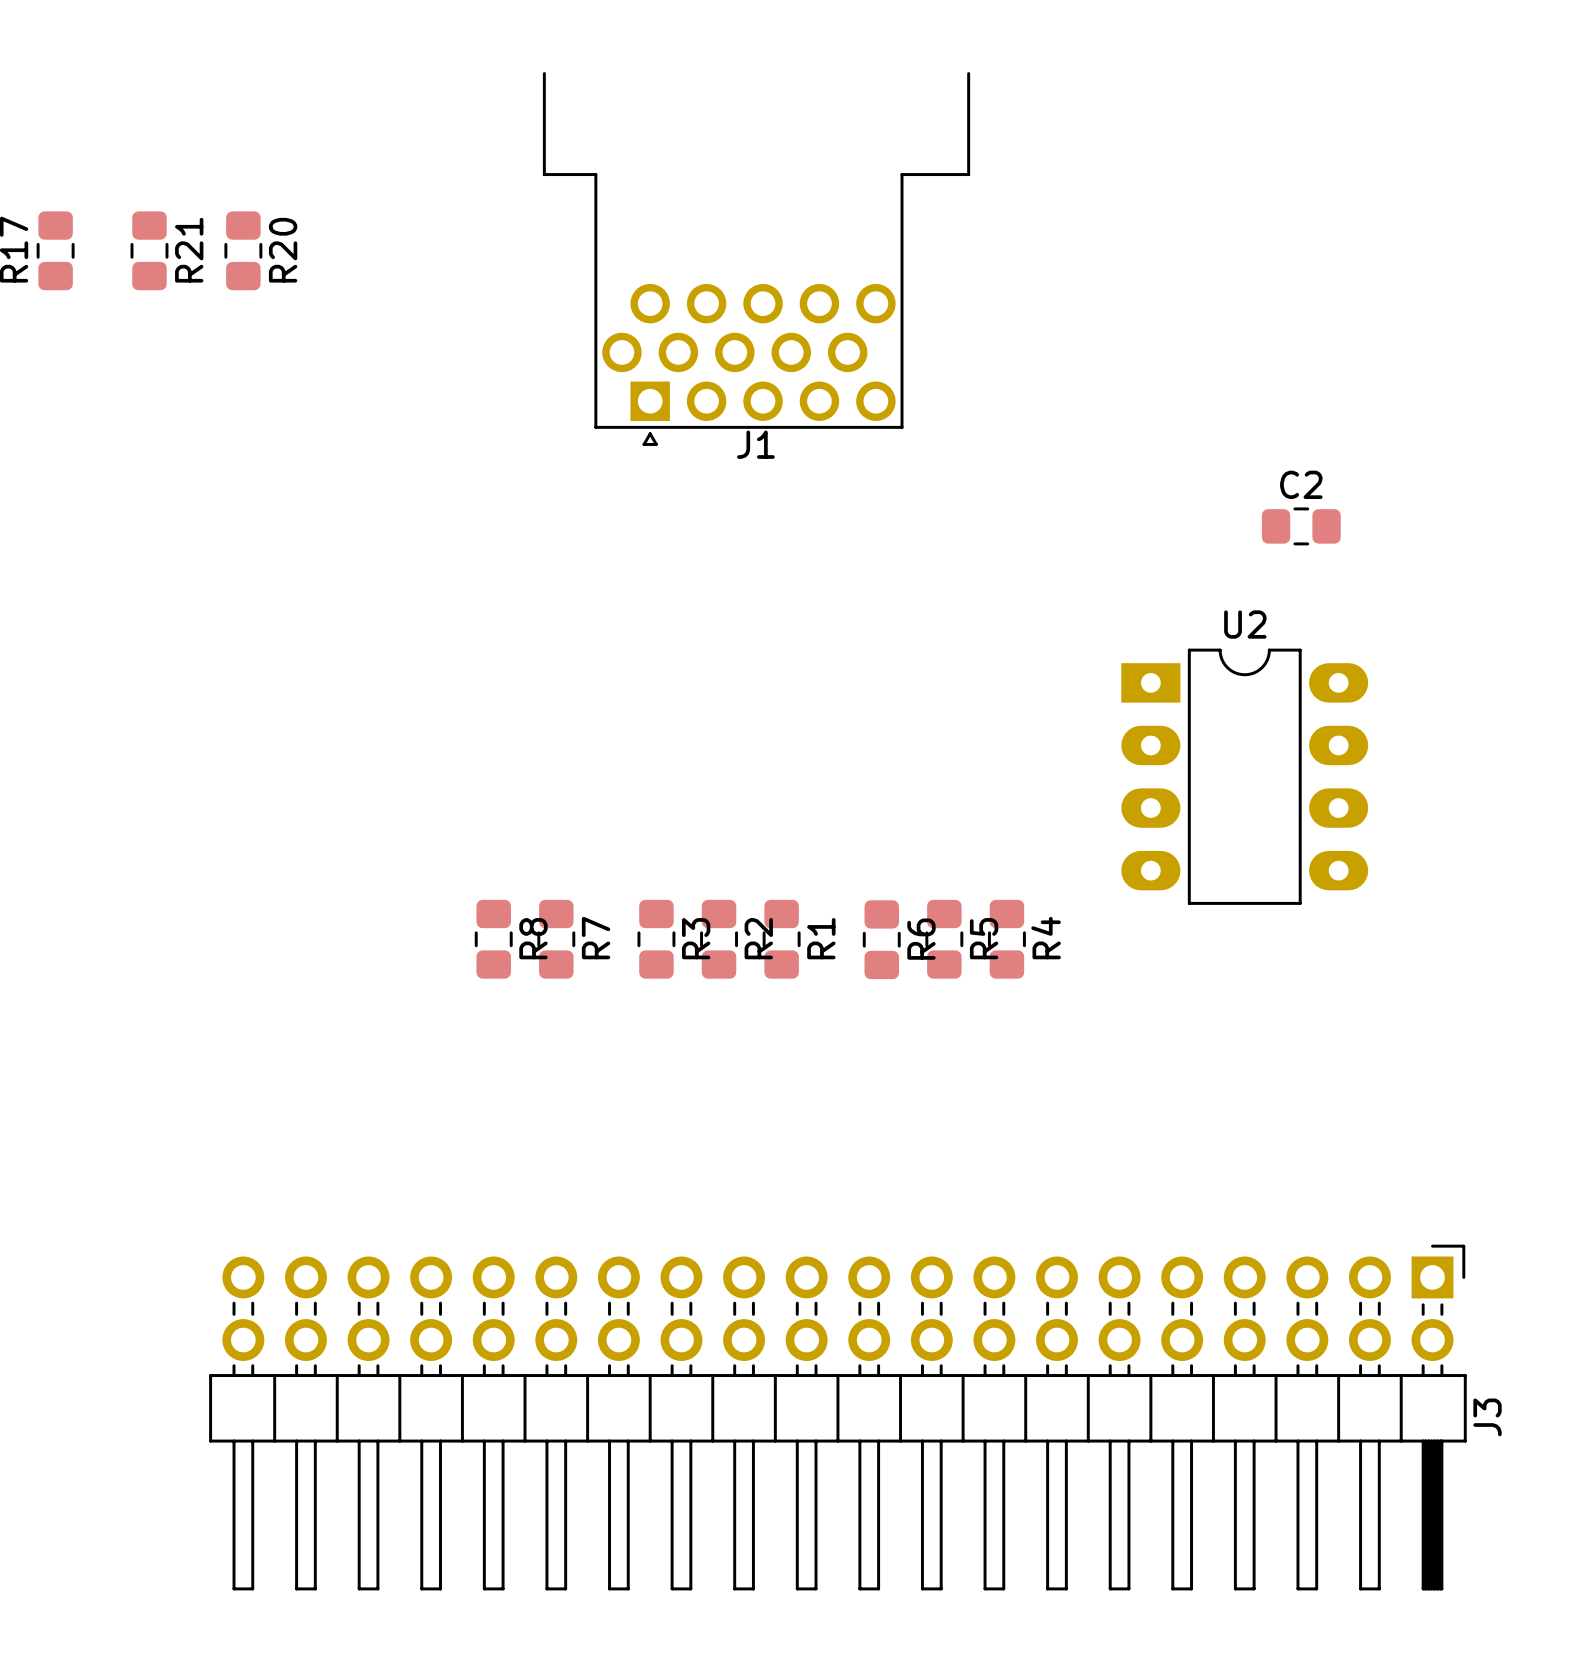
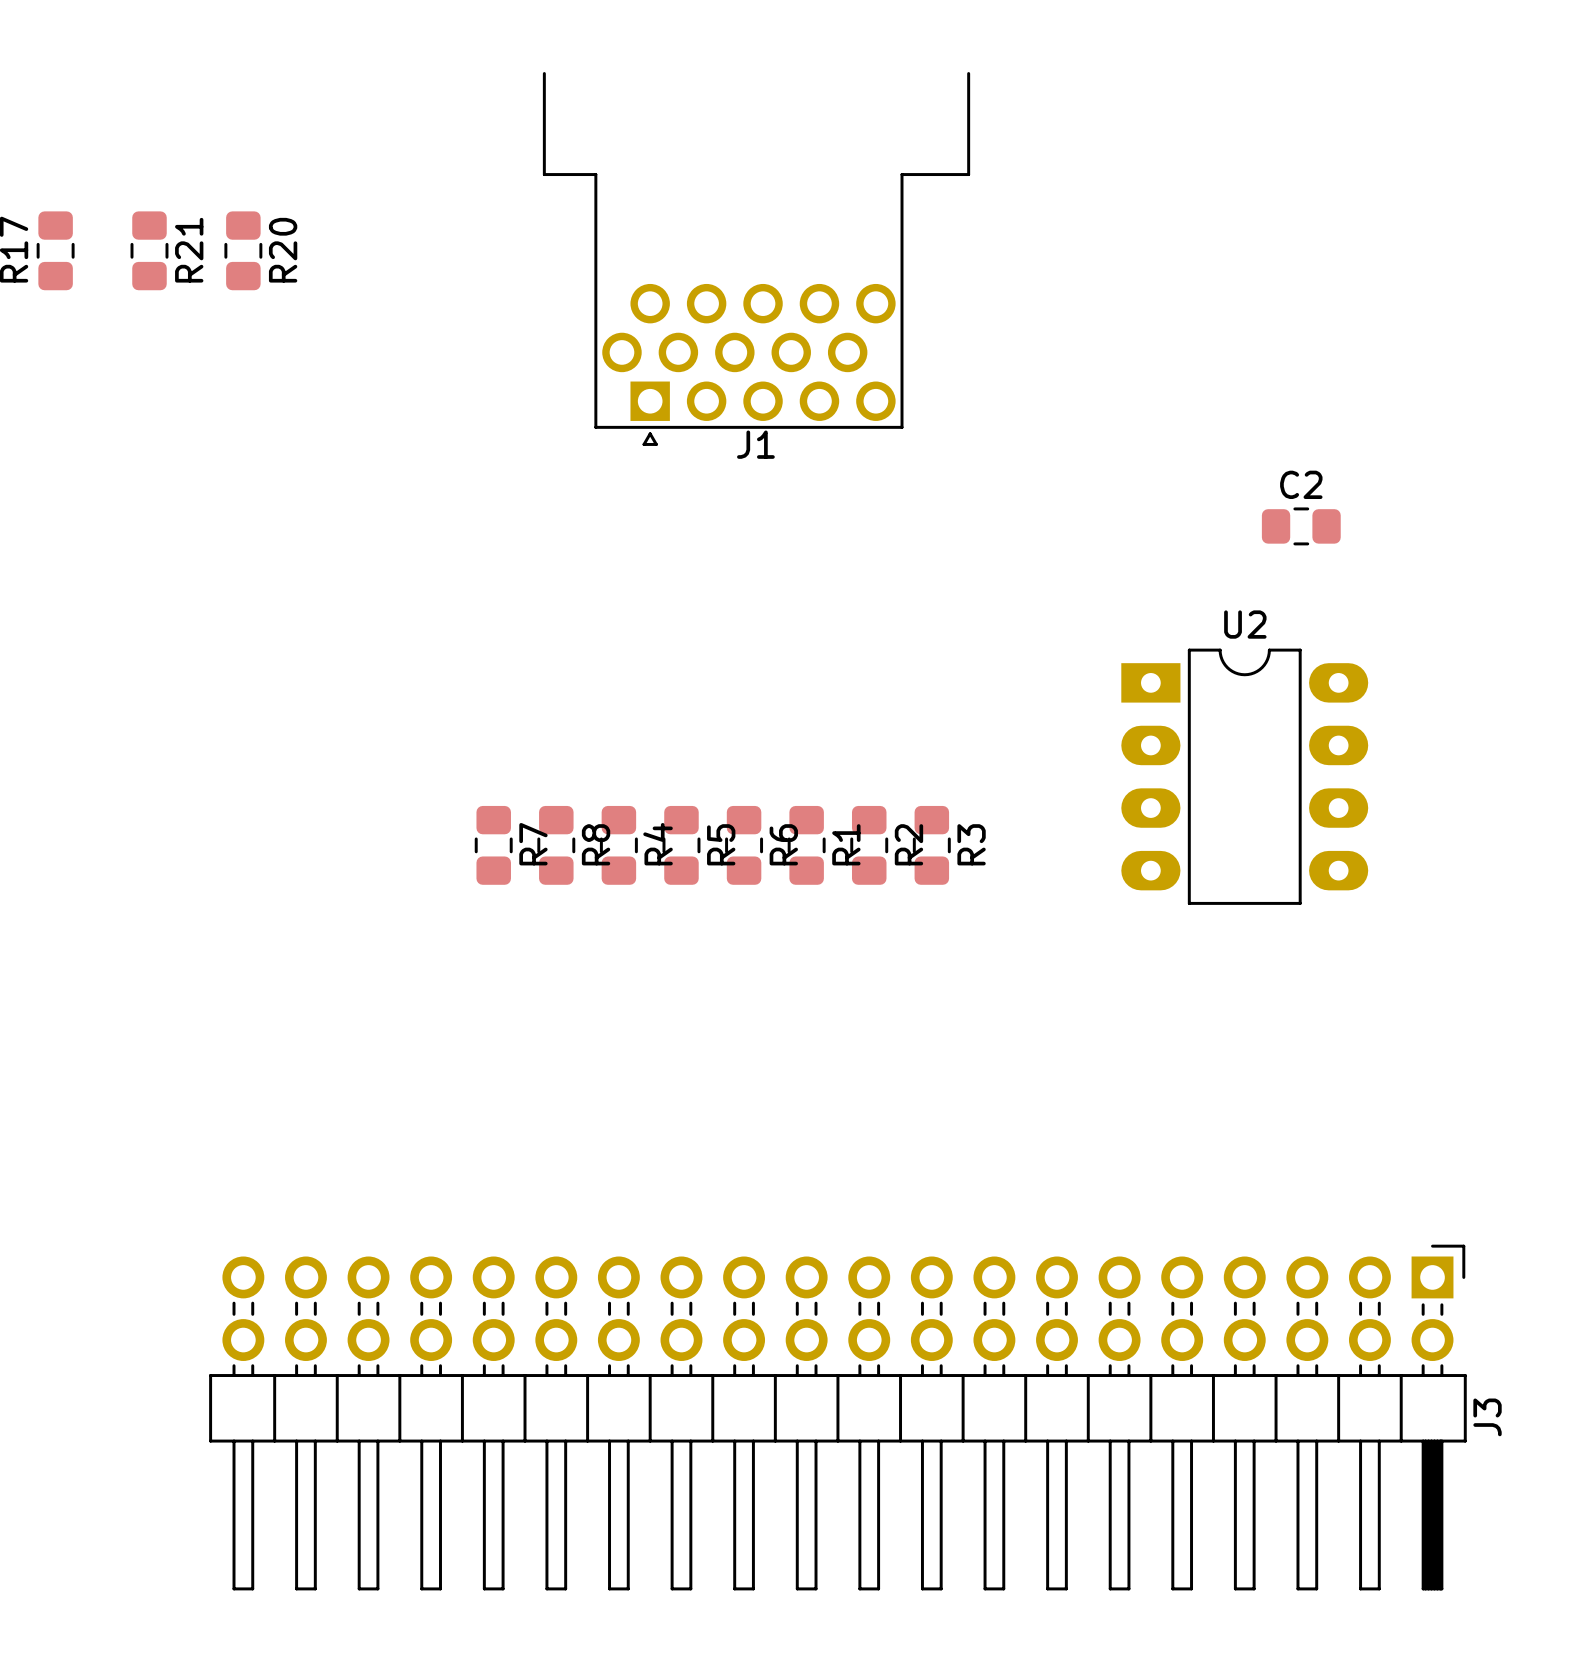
R8 position: (493, 939) -> (556, 845)
R7 position: (556, 939) -> (493, 845)
R3 position: (656, 939) -> (931, 845)
R2 position: (719, 939) -> (869, 845)
R1 position: (781, 939) -> (806, 845)
R6 position: (881, 939) -> (744, 845)
R5 position: (944, 939) -> (681, 845)
R4 position: (1006, 939) -> (618, 845)

